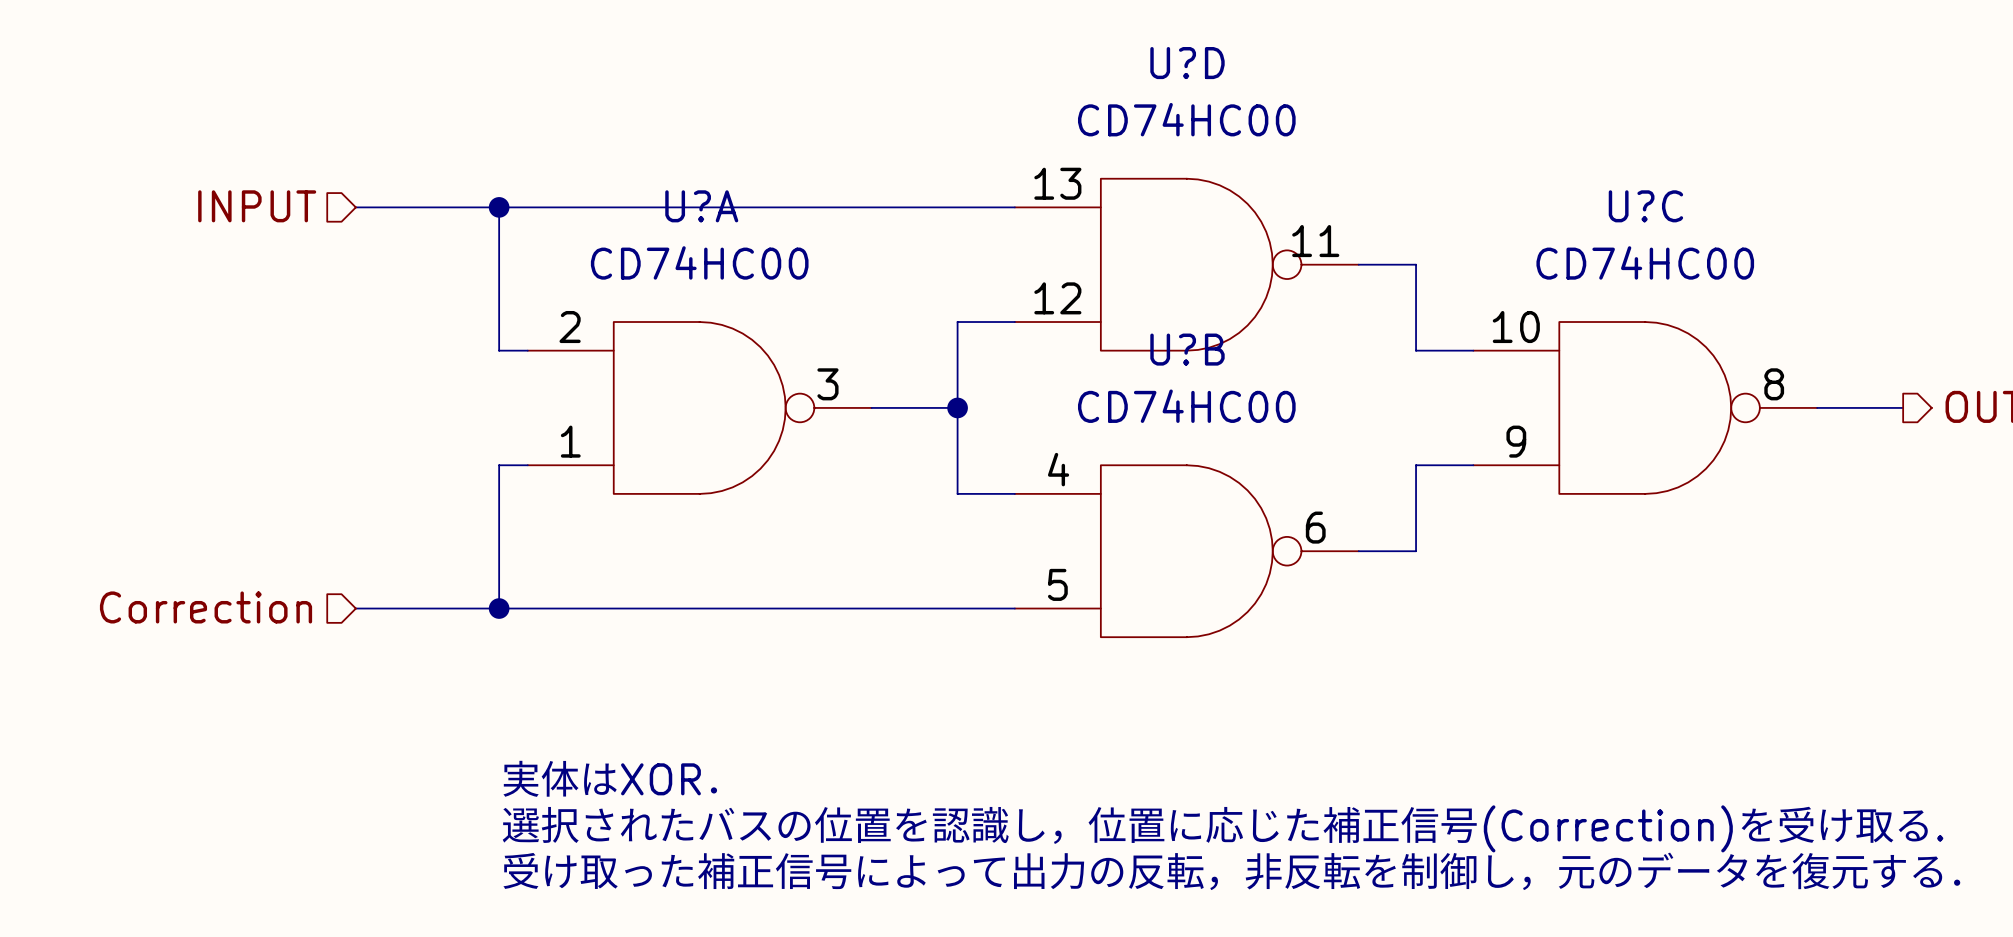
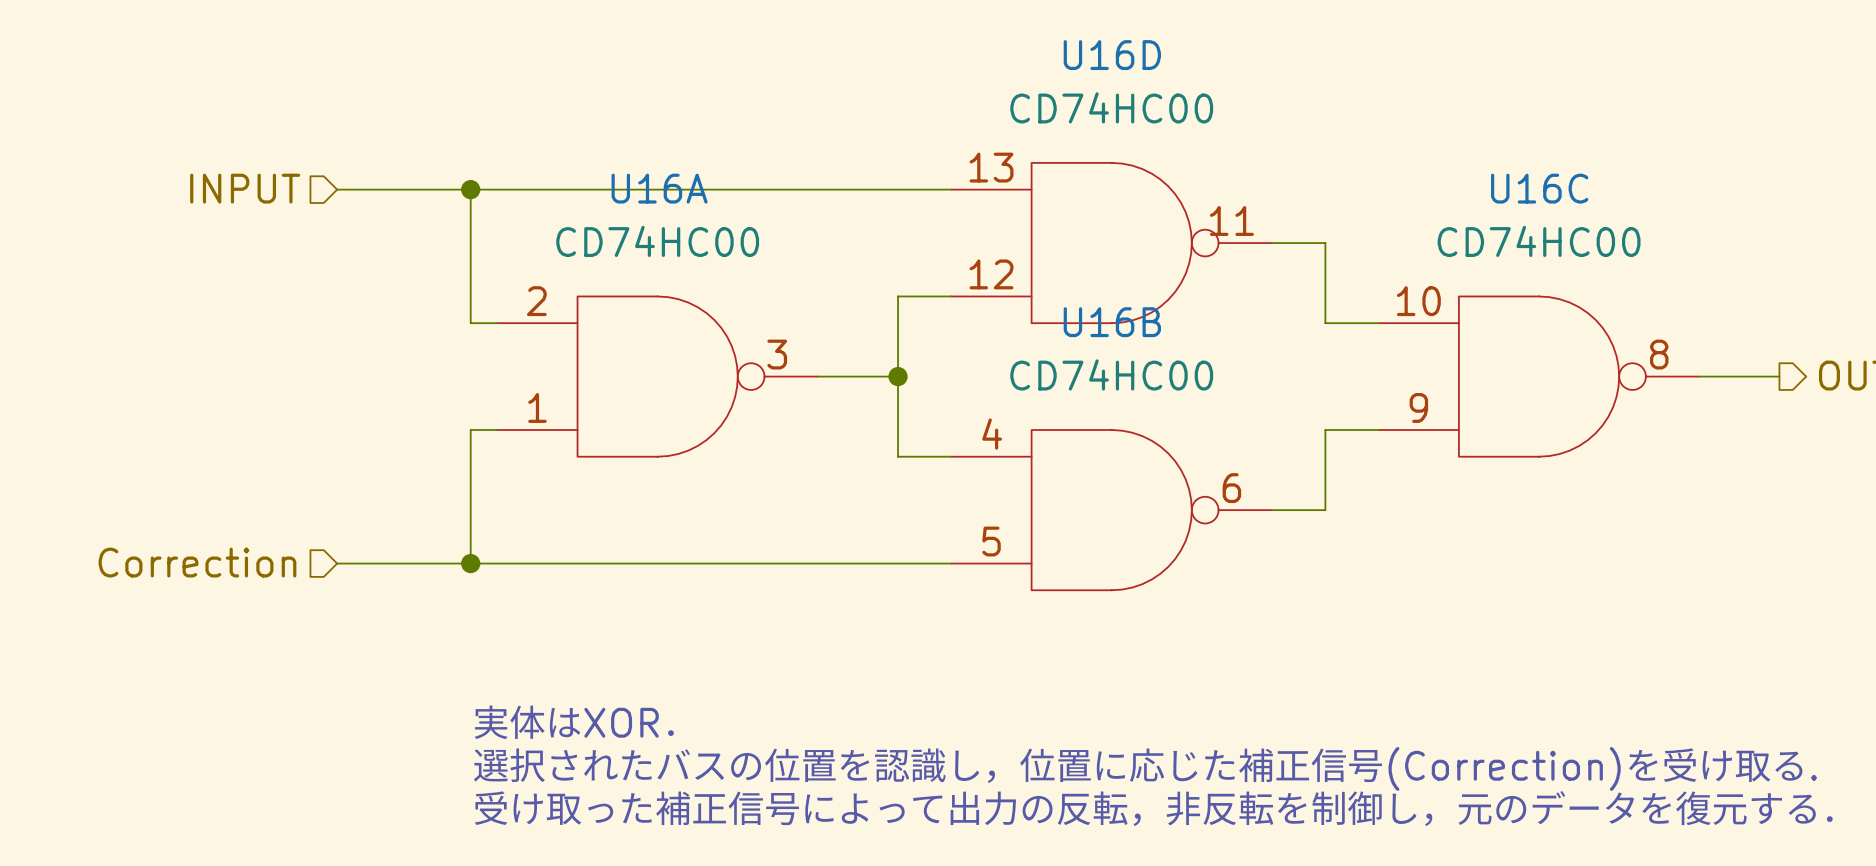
U?D name: U?D (1187, 63) -> U16D (1112, 55)
U?A name: U?A (701, 206) -> U16A (659, 188)
U?C name: U?C (1645, 206) -> U16C (1539, 188)
U?B name: U?B (1187, 349) -> U16B (1112, 322)

